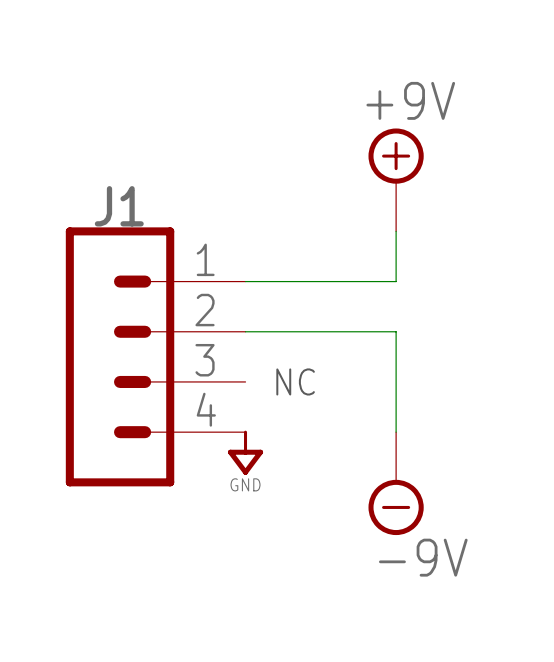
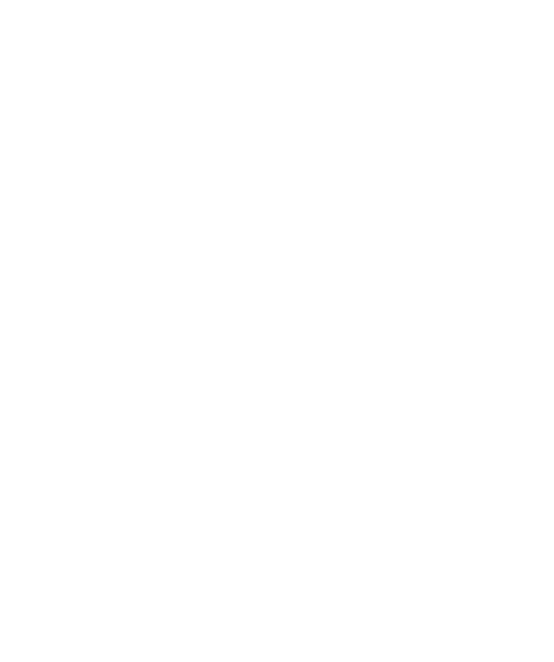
power symbol: +9V (396, 179) -> none
wire: (396, 231) (396, 281) (245, 281) -> none
wire: (245, 331) (396, 331) (396, 432) -> none
J1: (155, 356) -> none
text: NC (295, 381) -> none
power symbol: GND (245, 452) -> none
power symbol: -9V (396, 483) -> none

